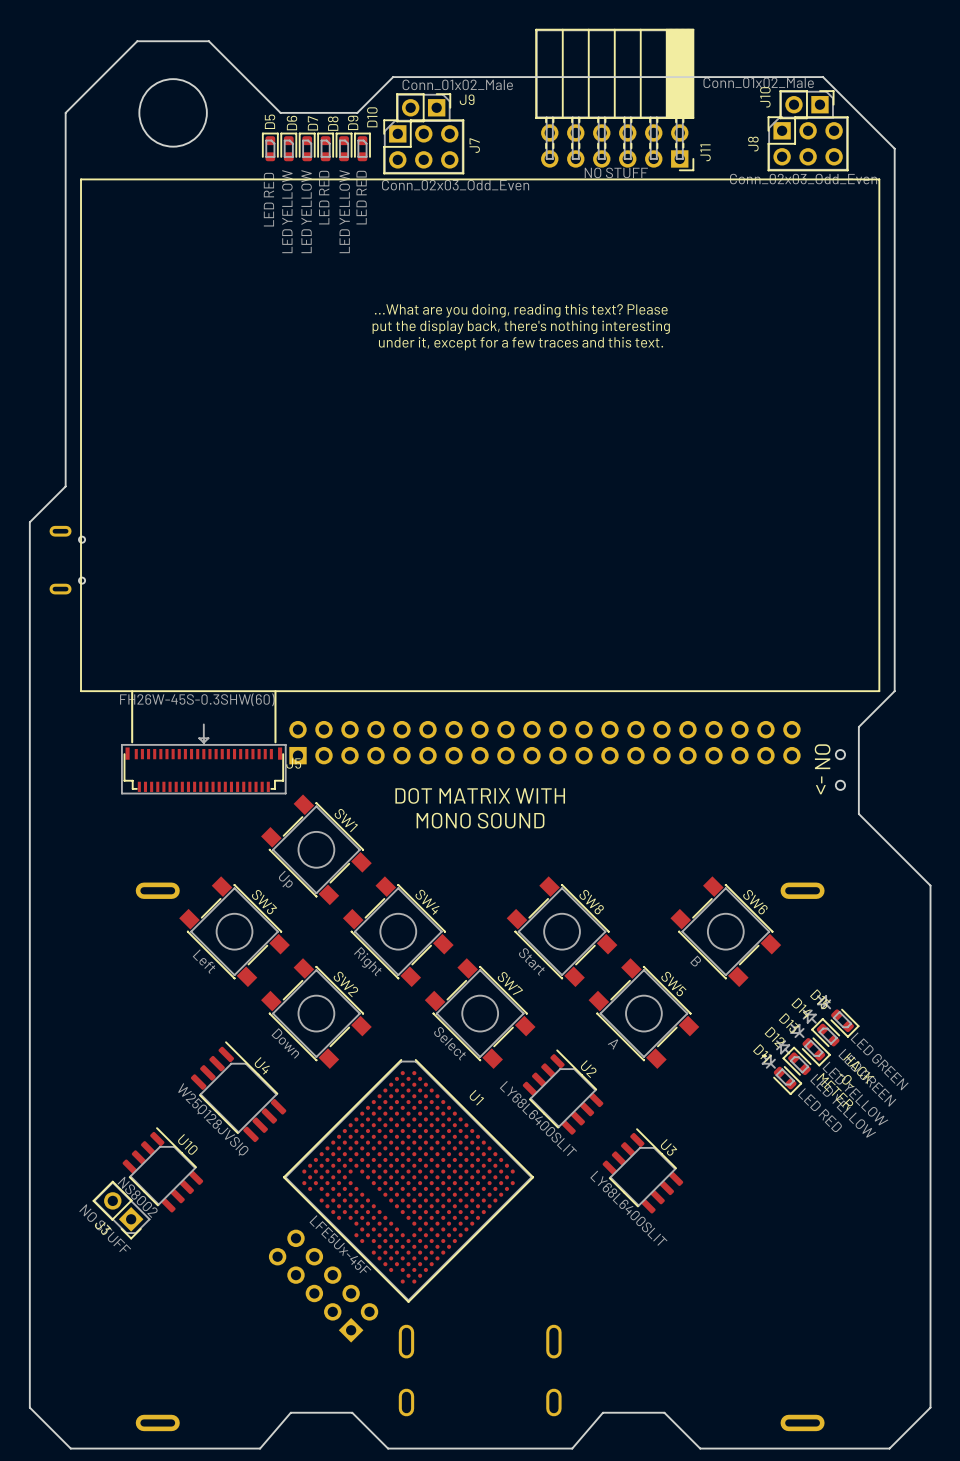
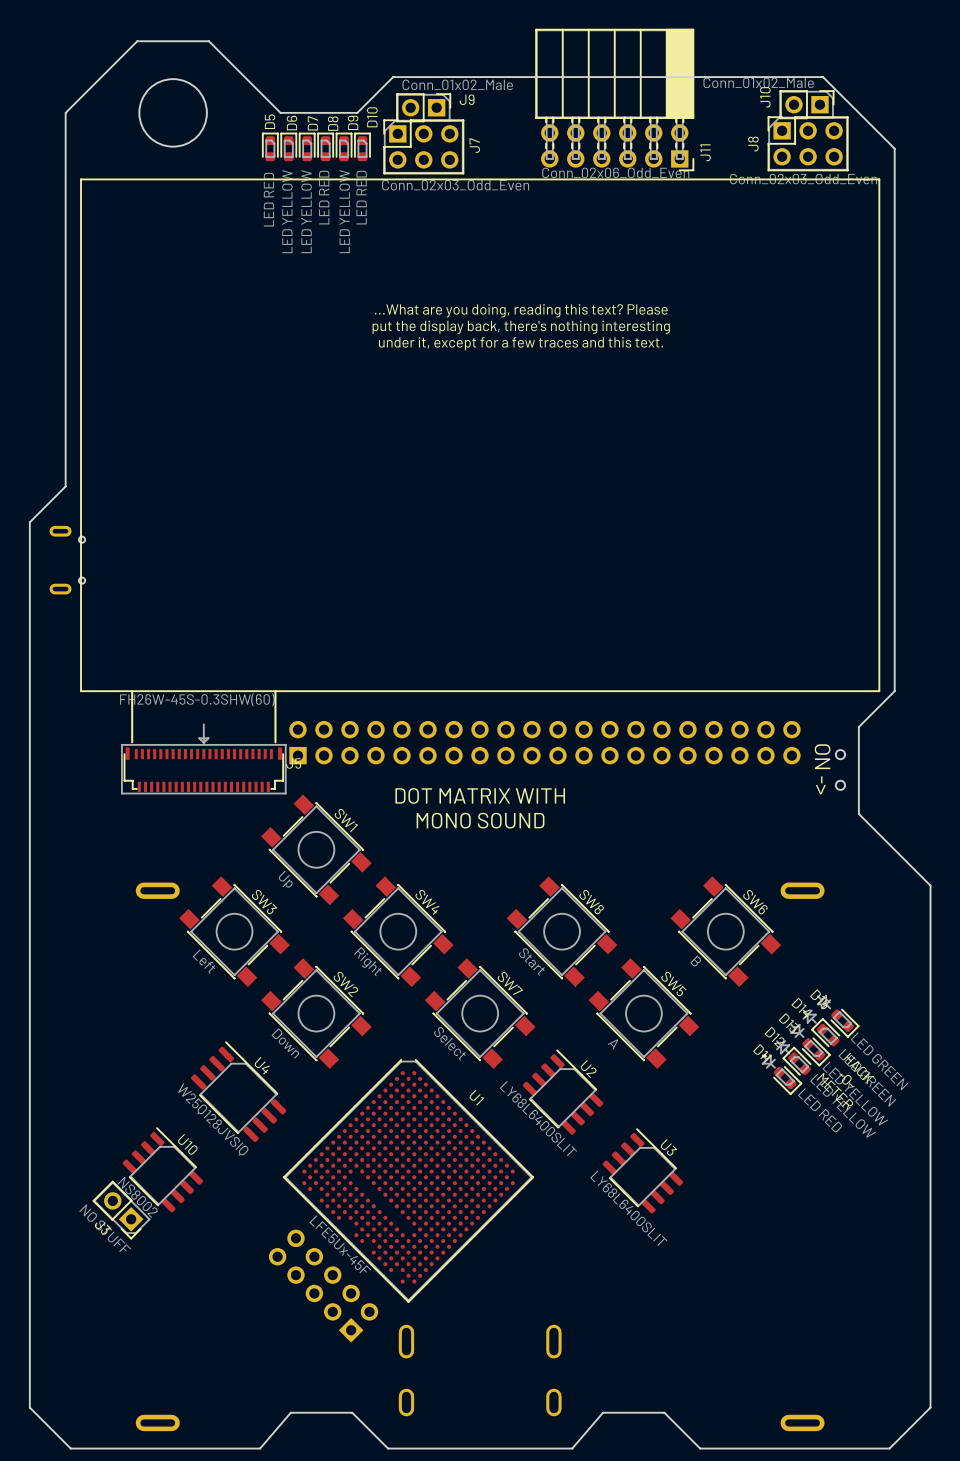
J11 value: NO STUFF (616, 172) -> Conn_02x06_Odd_Even (615, 172)

